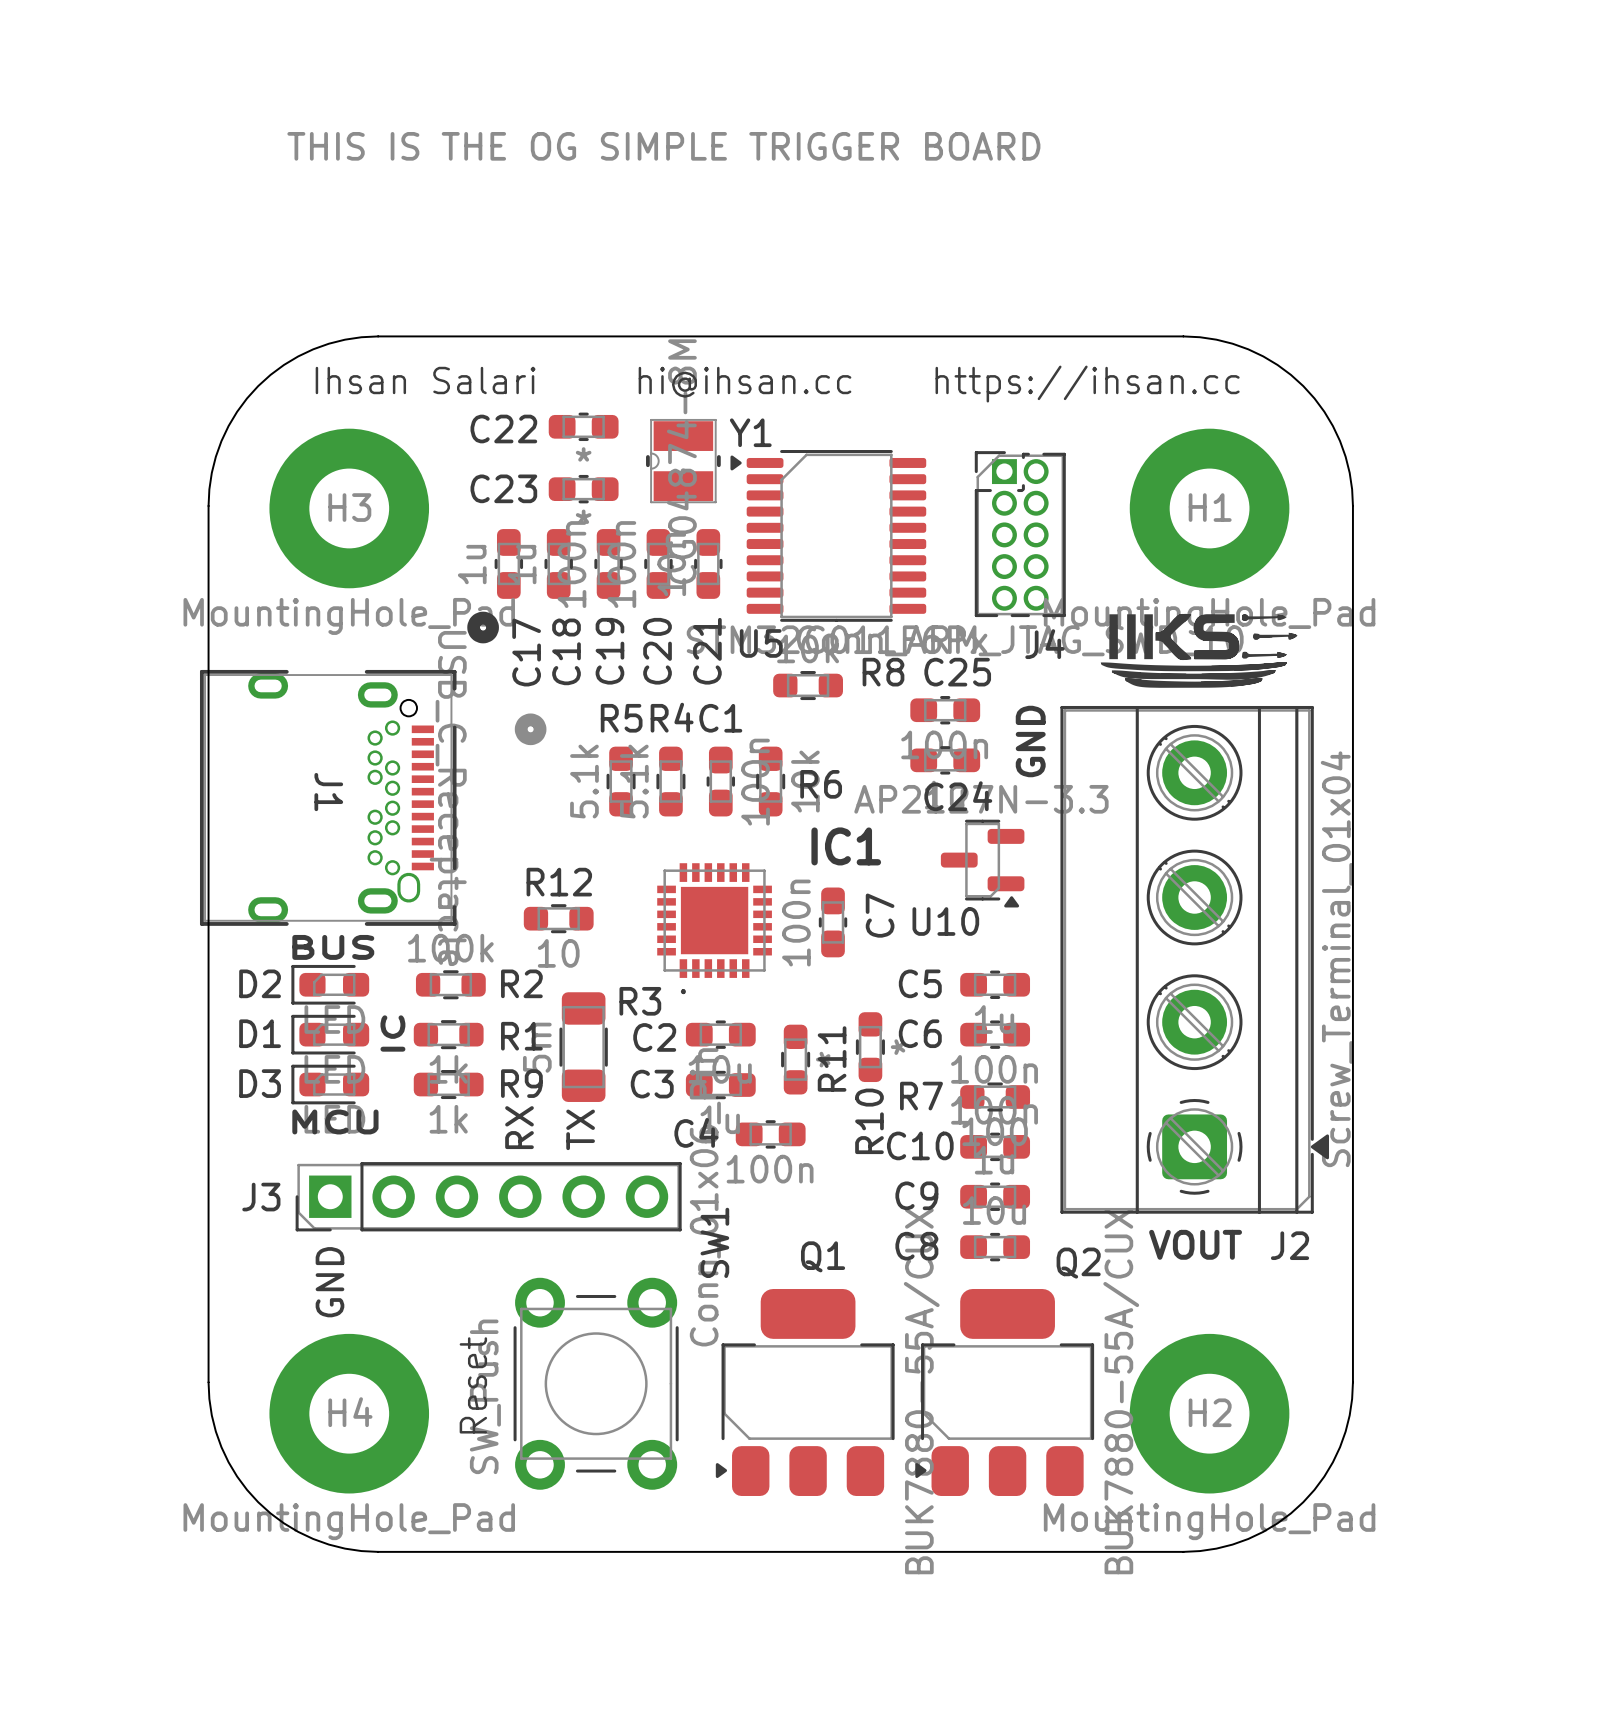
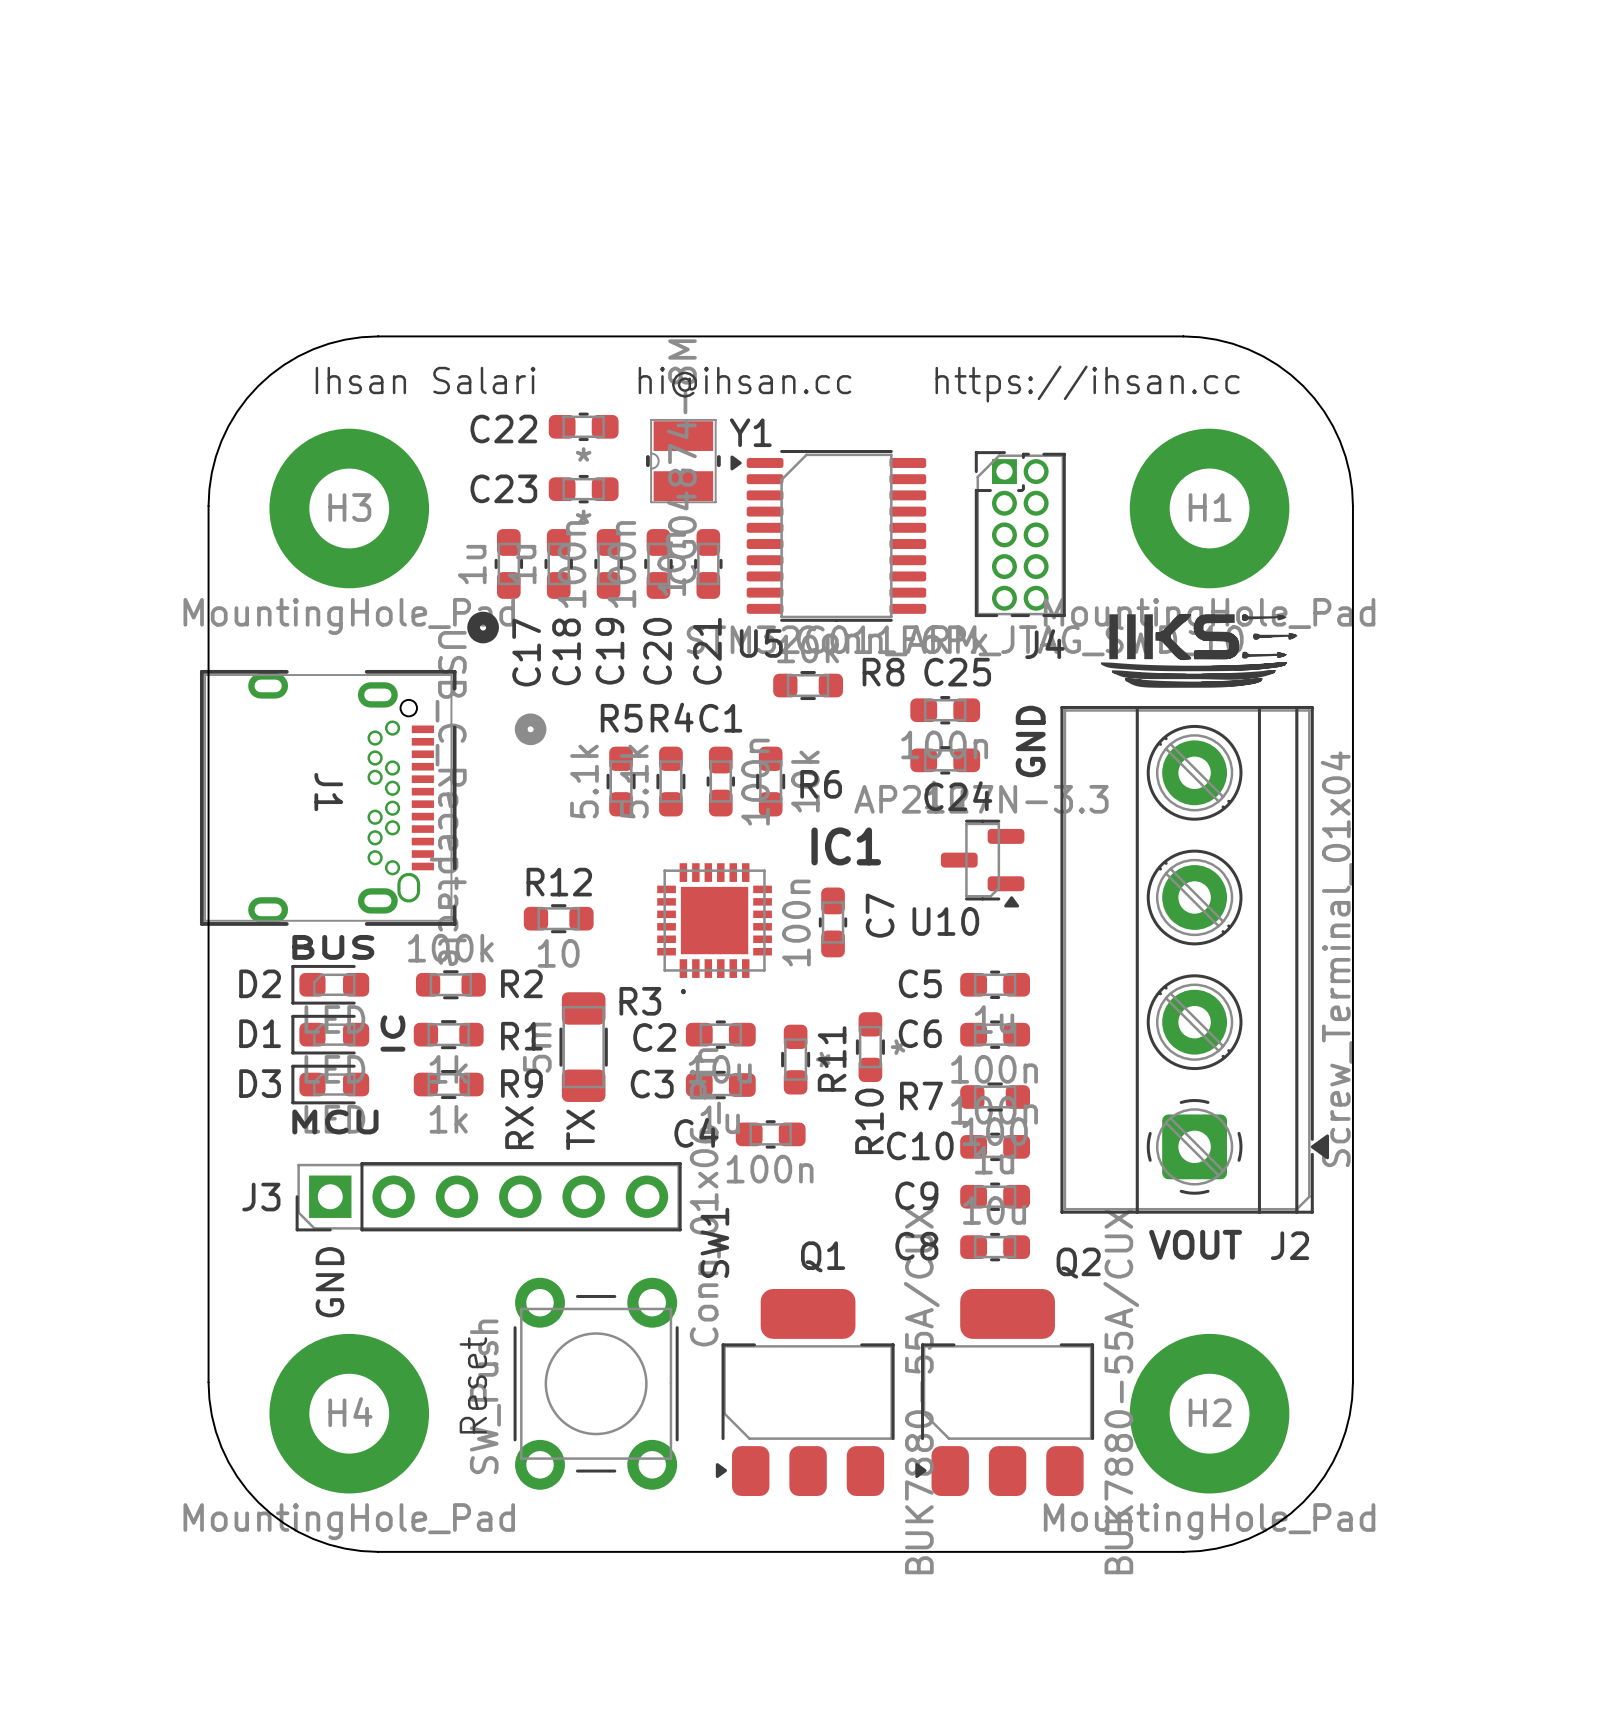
text: THIS IS THE OG SIMPLE TRIGGER BOARD (663, 146) -> none

